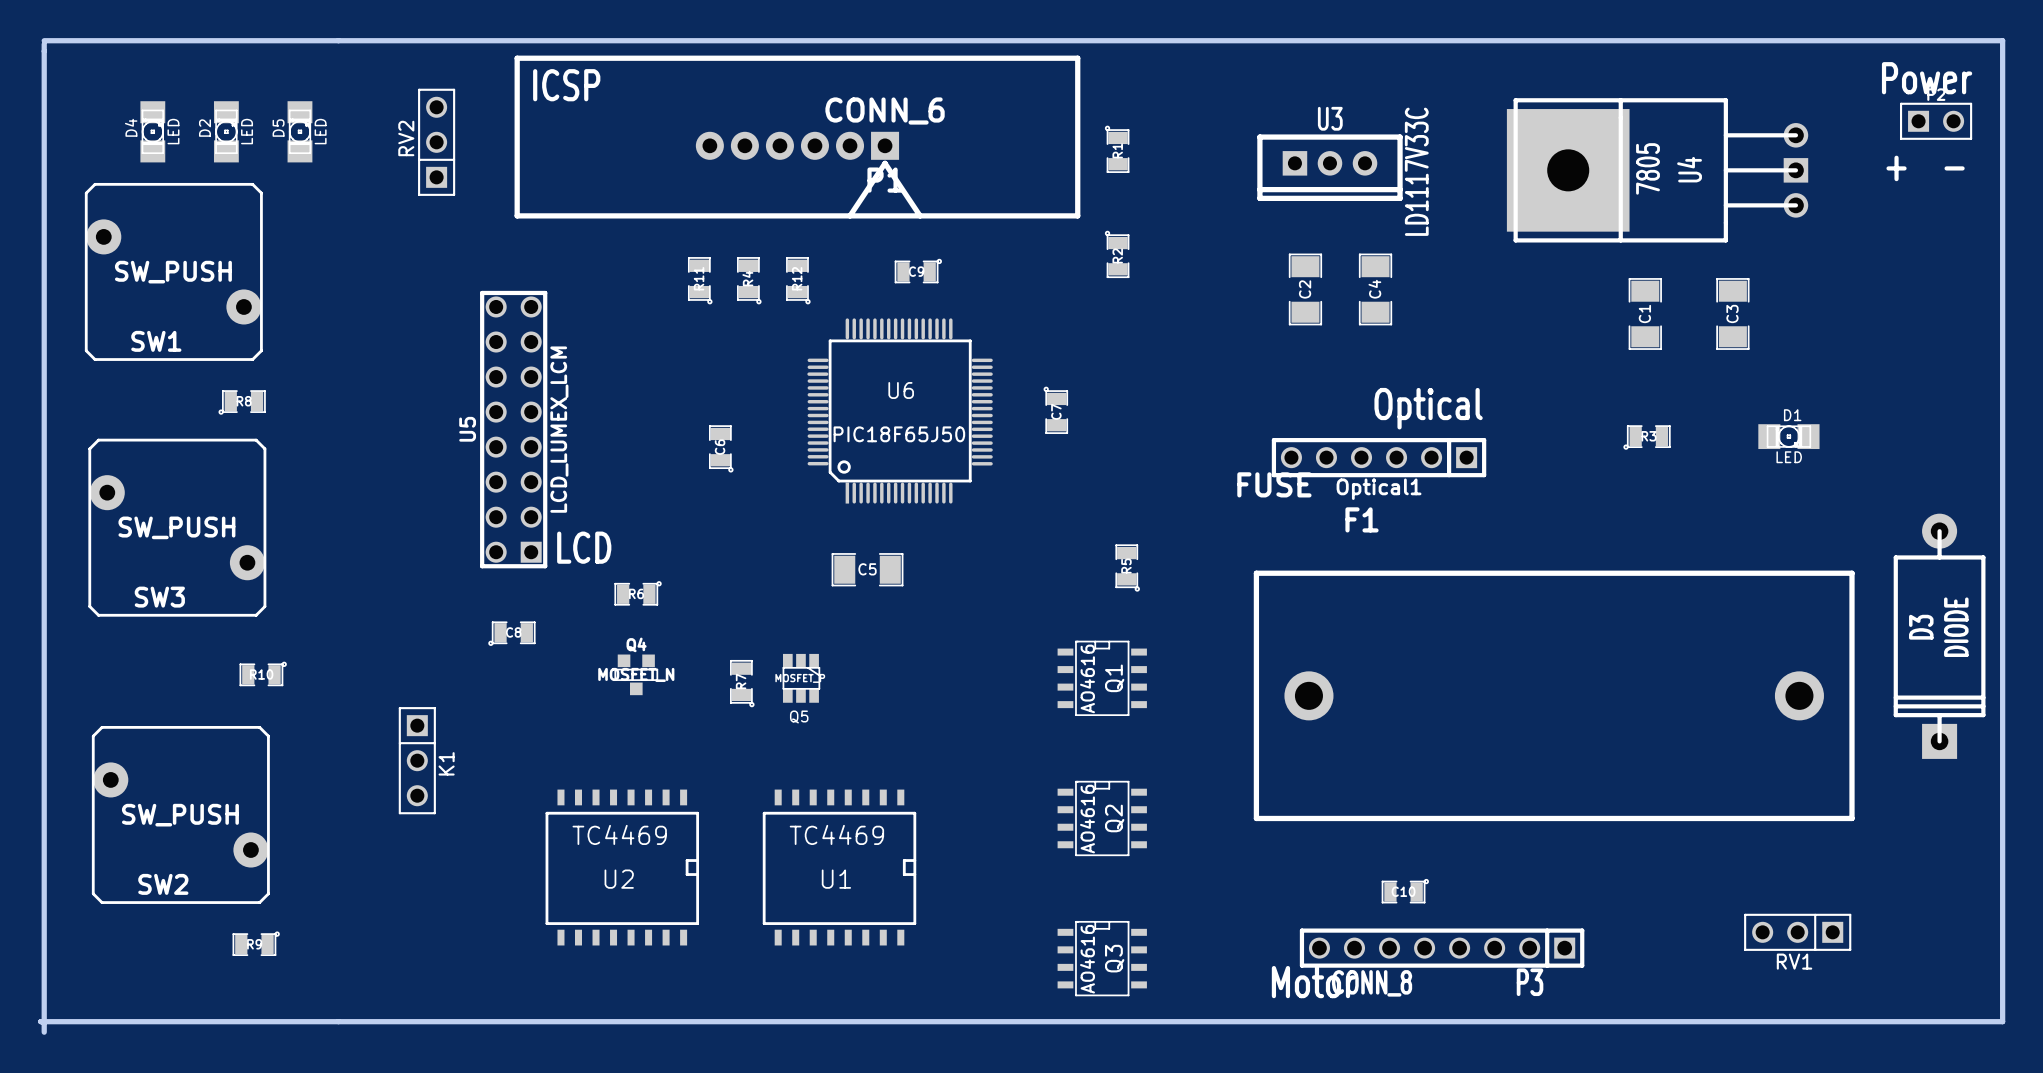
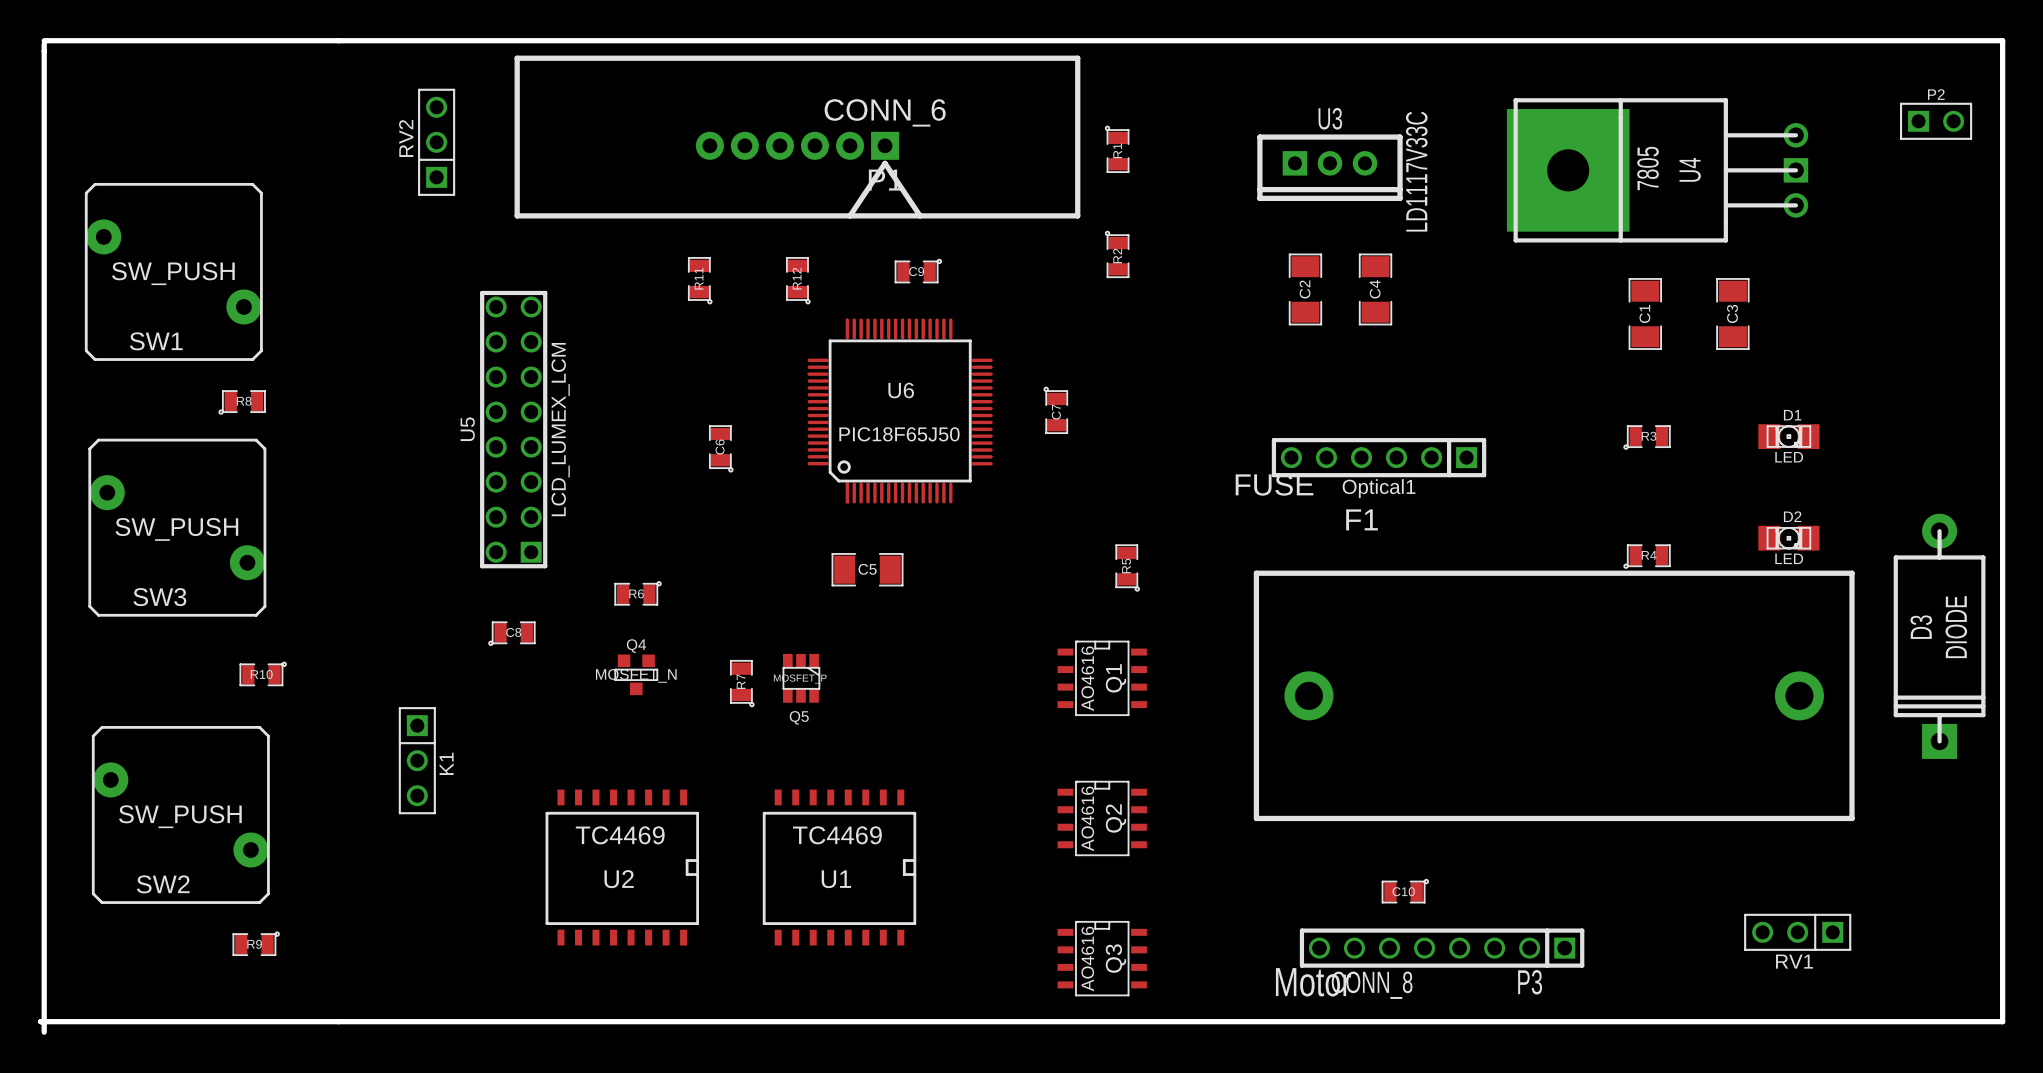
text: Power (1927, 78) -> none
text: ICSP (566, 85) -> none
D4: LED (152, 131) -> none
D2 rotation: 0° (226, 131) -> 90° clockwise (1788, 538)
D2 position: (226, 131) -> (1788, 538)
D5: LED (299, 131) -> none
text: + - (1925, 168) -> none
R4 rotation: 0° (749, 280) -> 90° clockwise (1647, 556)
R4 position: (749, 280) -> (1647, 556)
text: Optical (1428, 408) -> none
text: LCD (584, 547) -> none

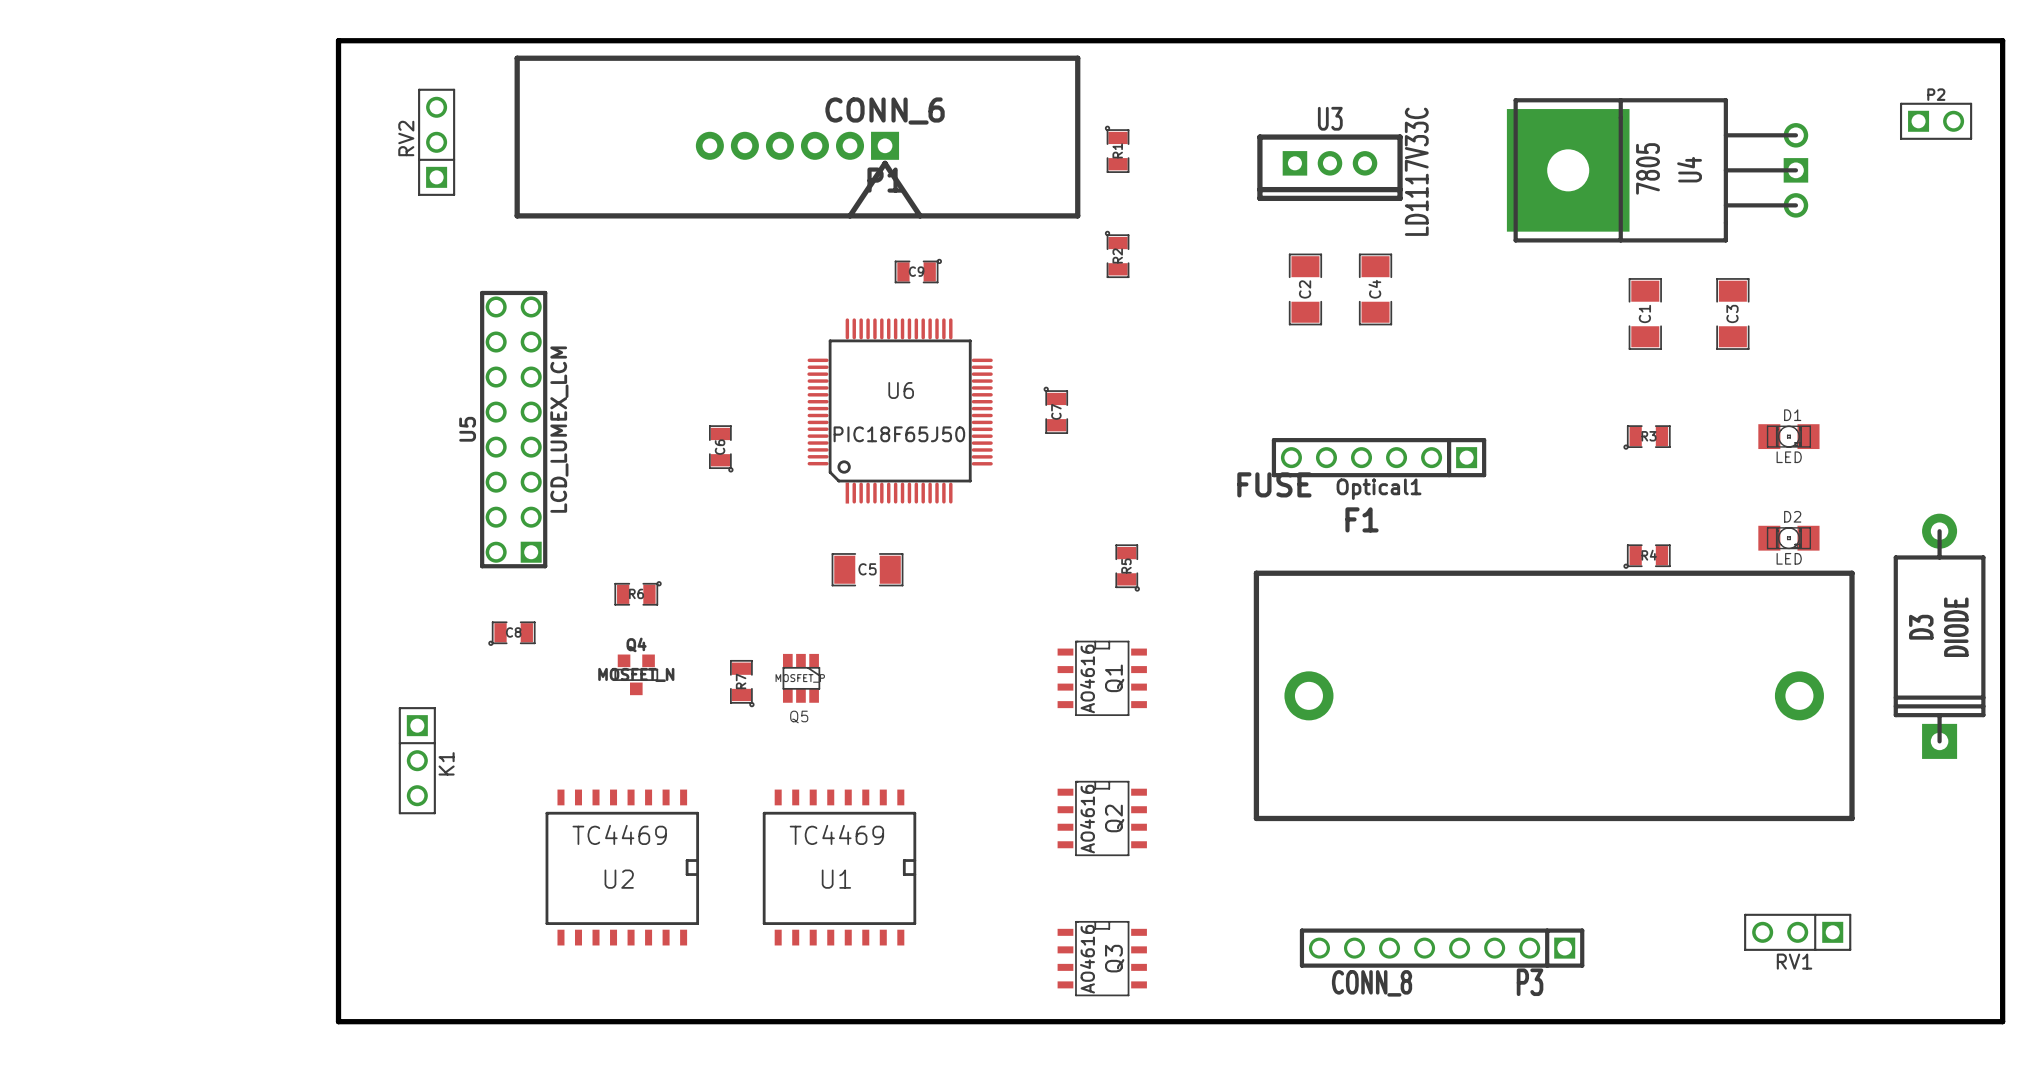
board edge: (44, 40) (338, 40) -> (338, 1021) (338, 40)
board edge: (44, 44) (44, 1032) -> none
SW1: SW_PUSH (173, 271) -> none
R11: (700, 280) -> none
R12: (798, 280) -> none
R8: (242, 402) -> none
SW3: SW_PUSH (177, 527) -> none
R10: (263, 673) -> none
SW2: SW_PUSH (180, 814) -> none
C10: (1405, 891) -> none
R9: (256, 943) -> none
text: Motor (1313, 982) -> none
board edge: (40, 1021) (338, 1021) -> none

